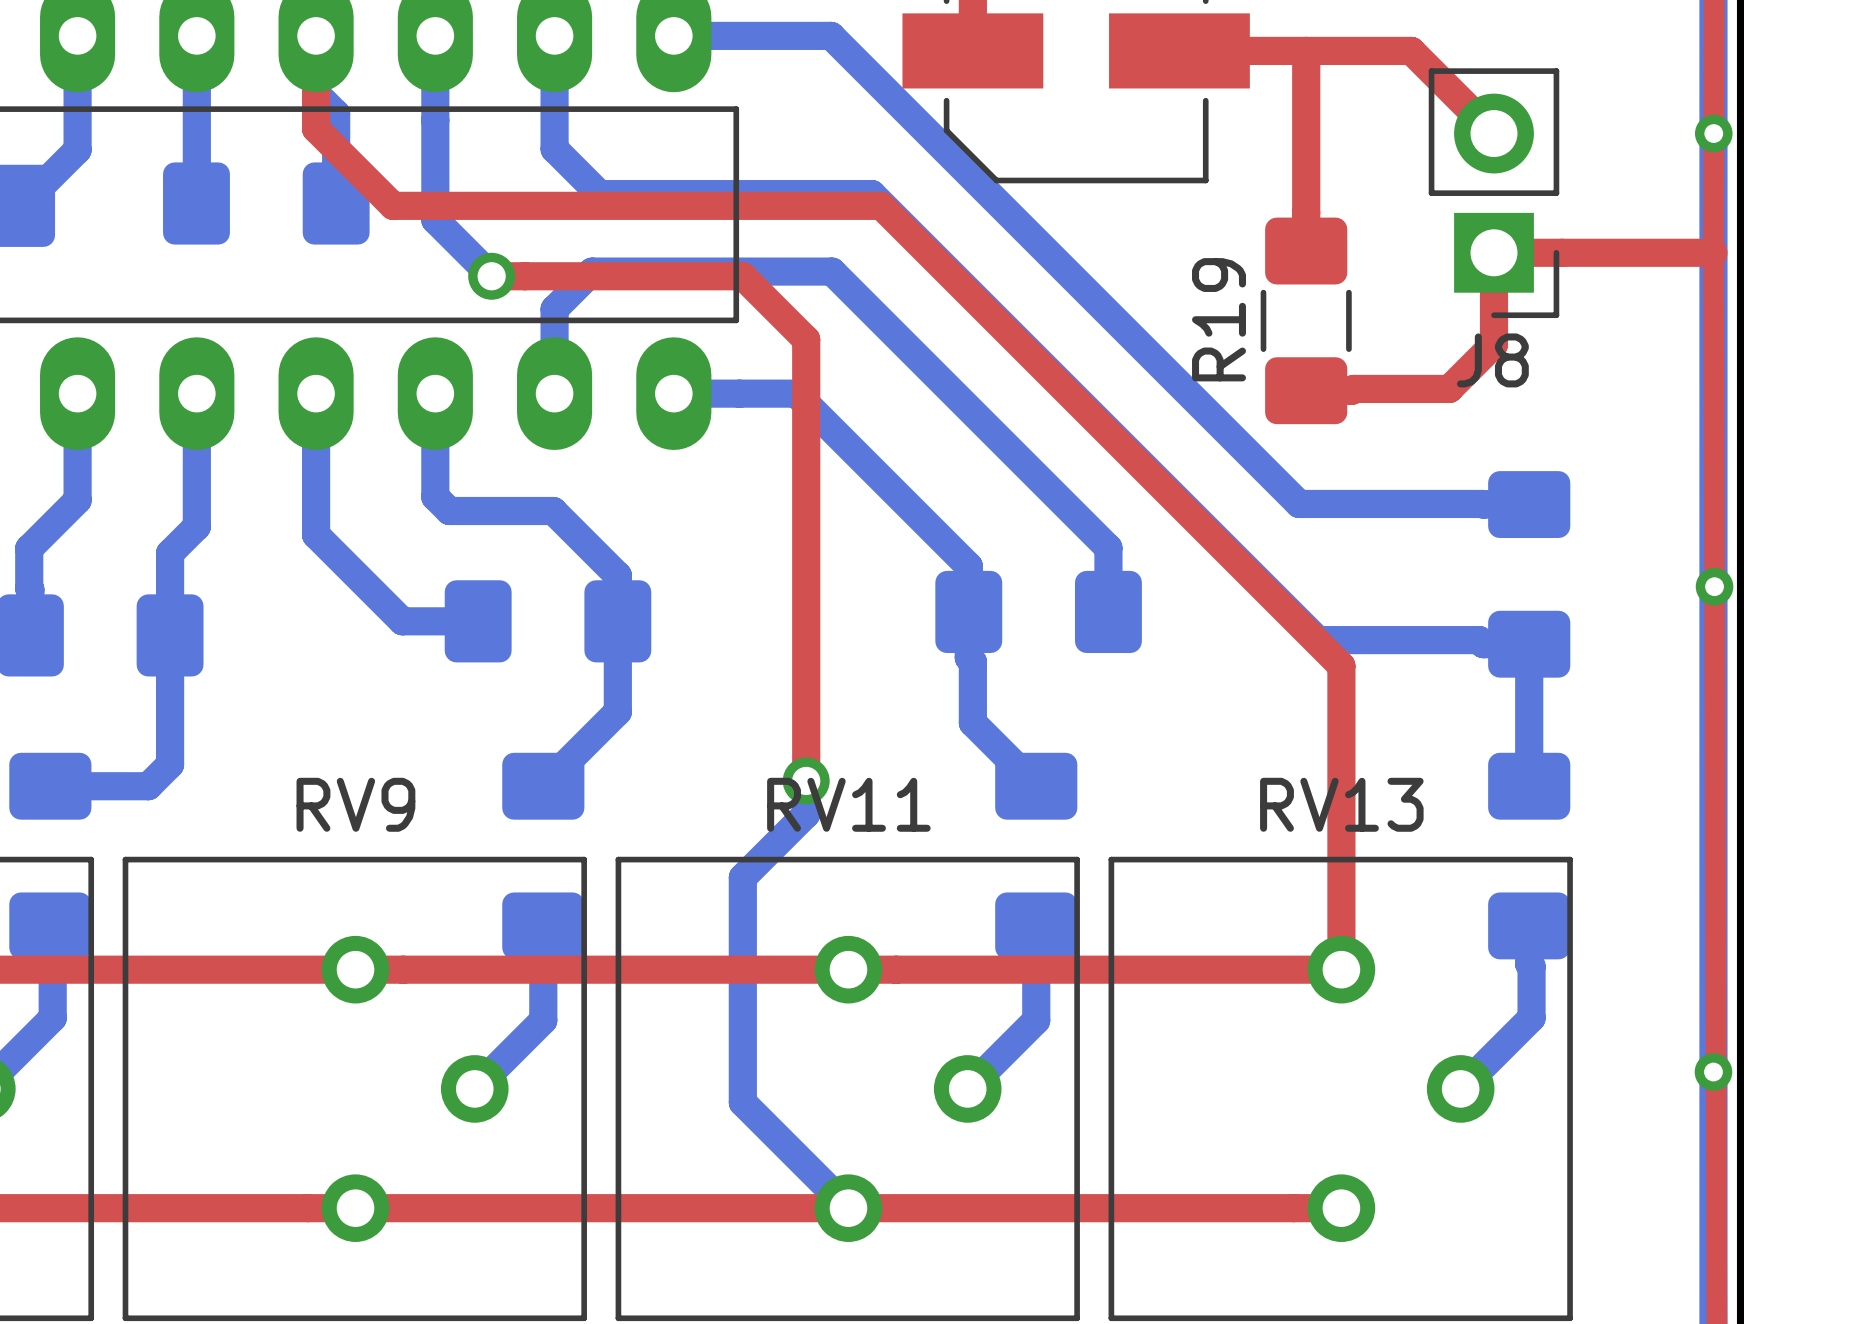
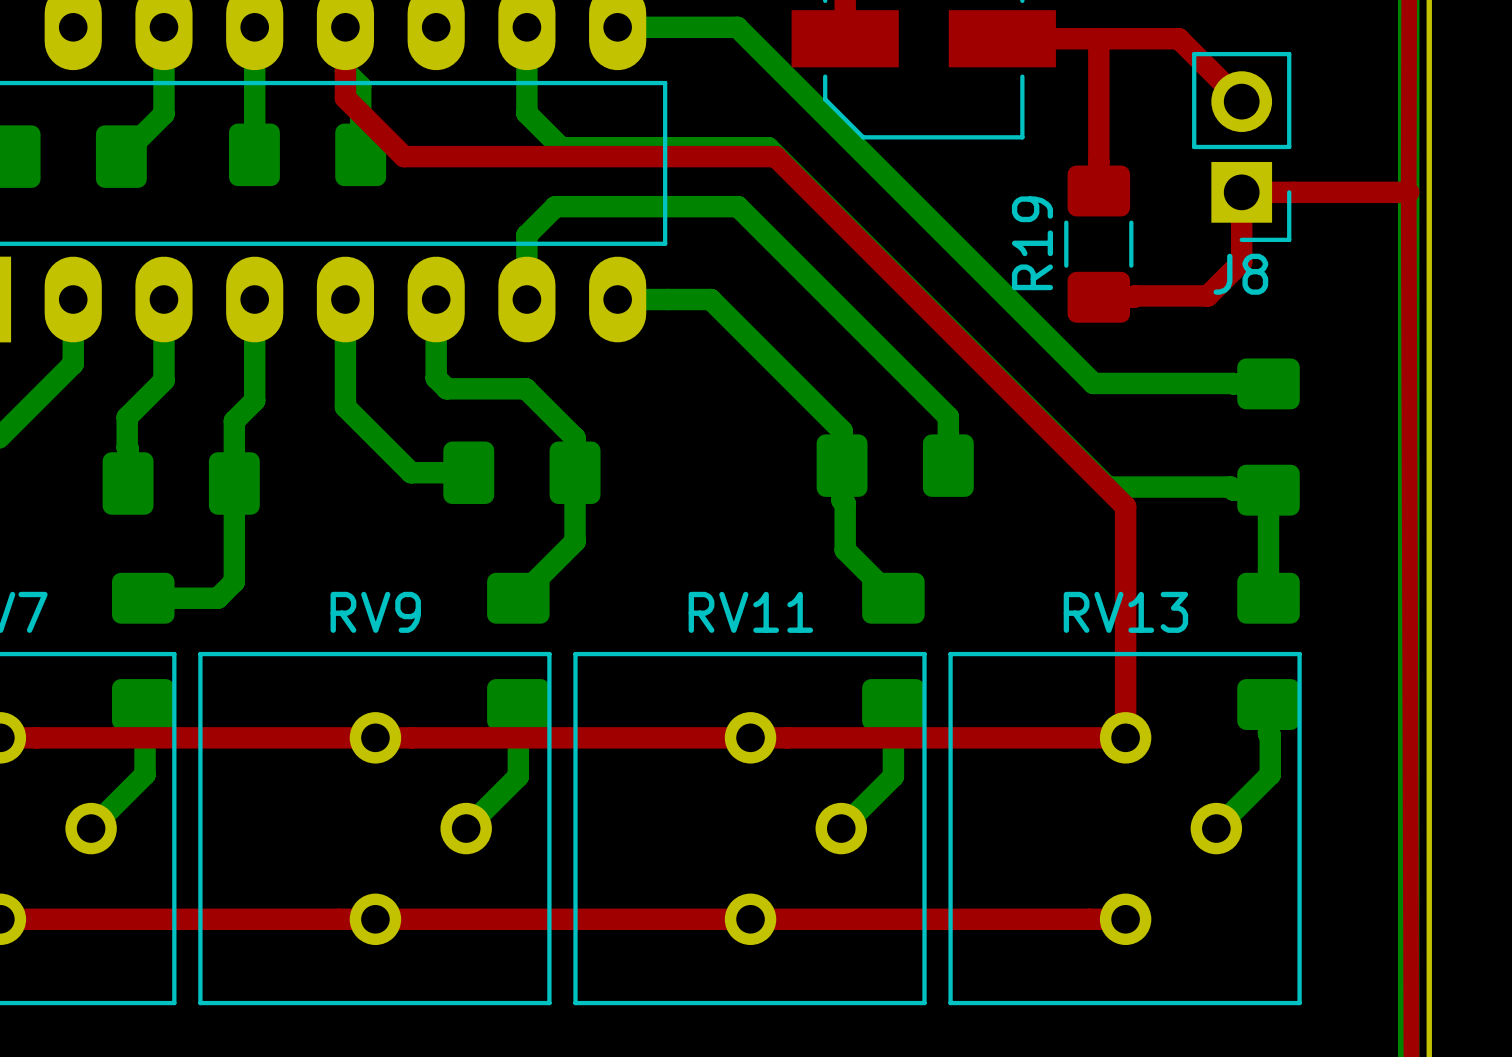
bottom track: (435, 35) (435, 219) (491, 276) -> none
via: (1713, 133) -> none
top track: (491, 276) (742, 276) (806, 339) (806, 780) -> none
via: (491, 276) -> none
via: (1714, 586) -> none
bottom track: (806, 780) (806, 814) (742, 877) (742, 1102) (848, 1208) -> none
via: (806, 780) -> none
via: (1713, 1072) -> none

